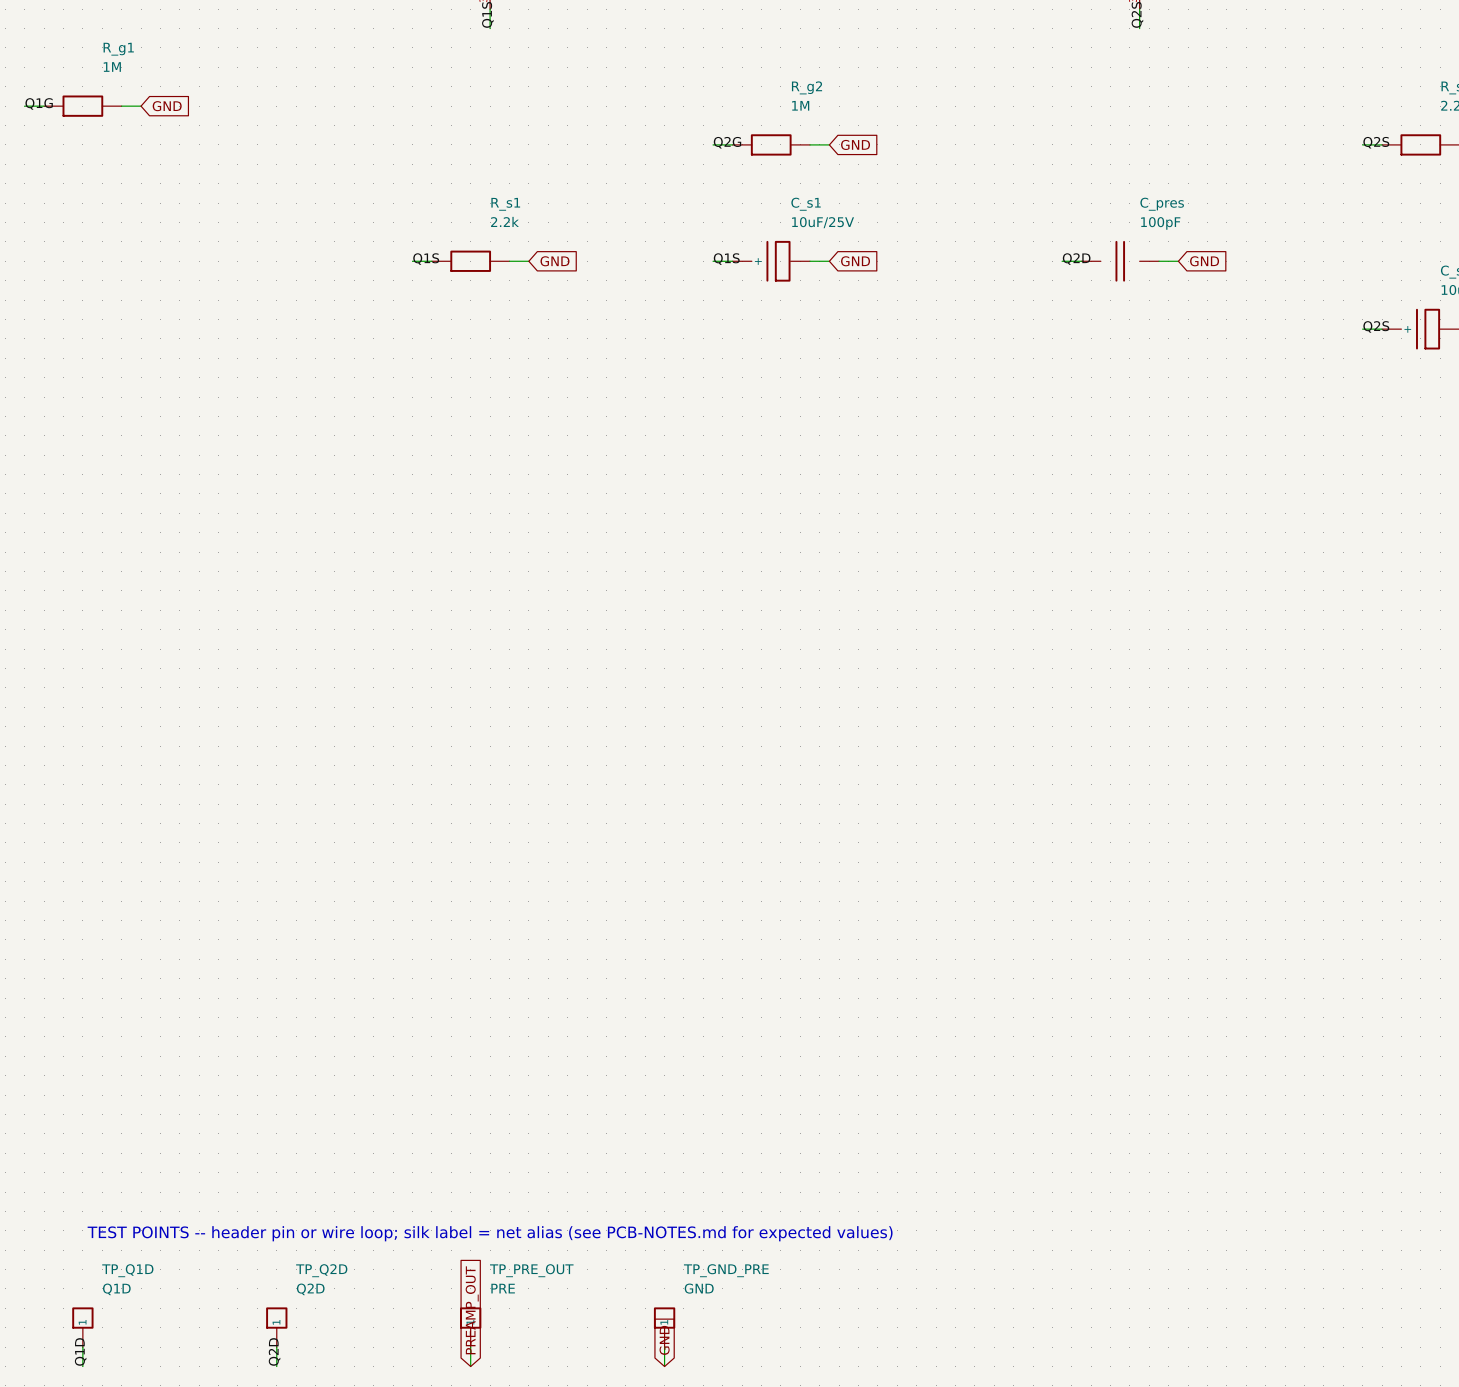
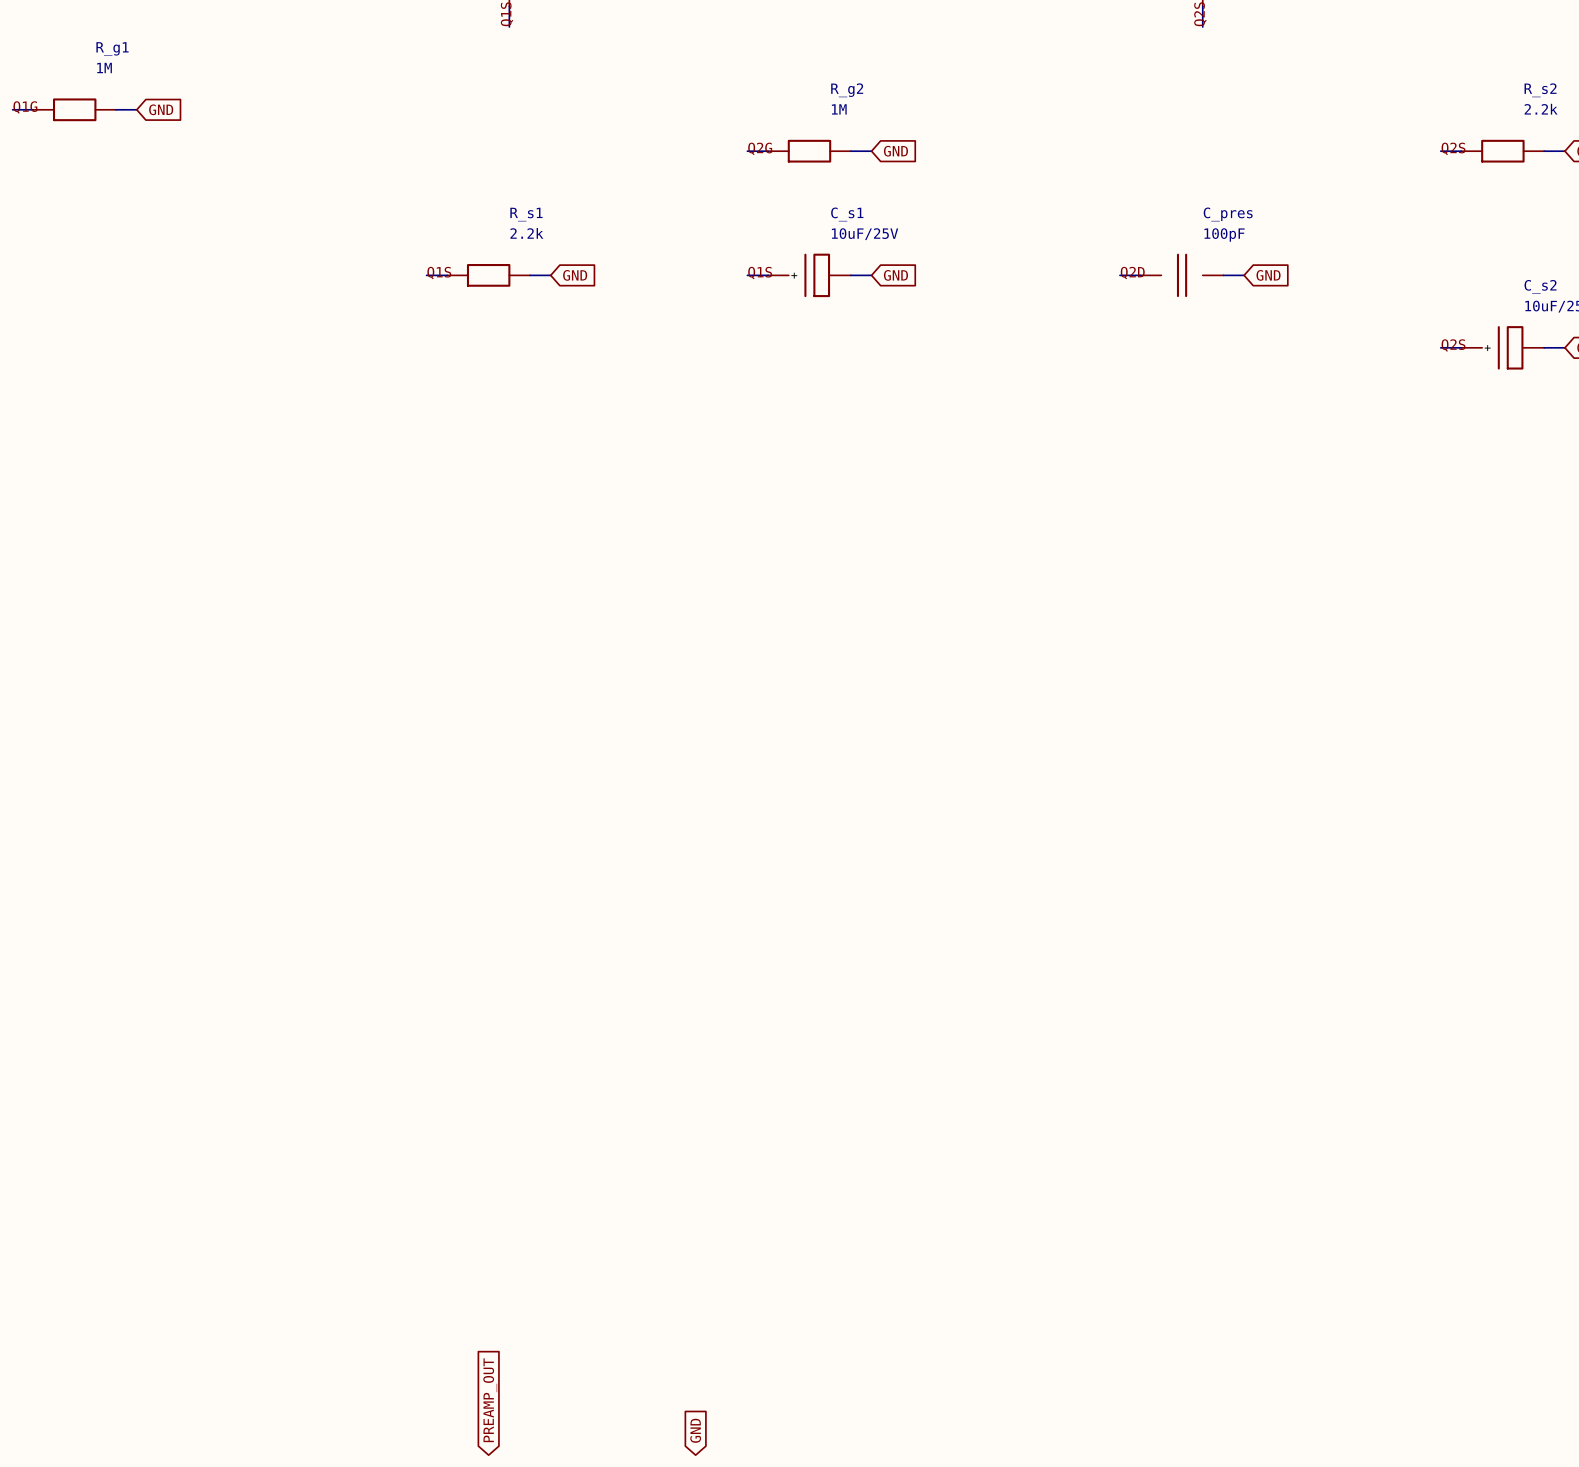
text: TEST POINTS -- header pin or wire loop; silk label = net alias (see PCB-NOTES.md for expected values) (490, 1233) -> none
TP_Q1D: Q1D (82, 1327) -> none
TP_Q2D: Q2D (276, 1327) -> none
TP_PRE_OUT: PRE (470, 1327) -> none
TP_GND_PRE: GND (664, 1327) -> none
wire: (82, 1347) (82, 1366) -> none
wire: (276, 1347) (276, 1366) -> none
wire: (470, 1347) (470, 1366) -> none
wire: (664, 1347) (664, 1366) -> none
label: Q1D (80, 1351) -> none
label: Q2D (274, 1351) -> none

